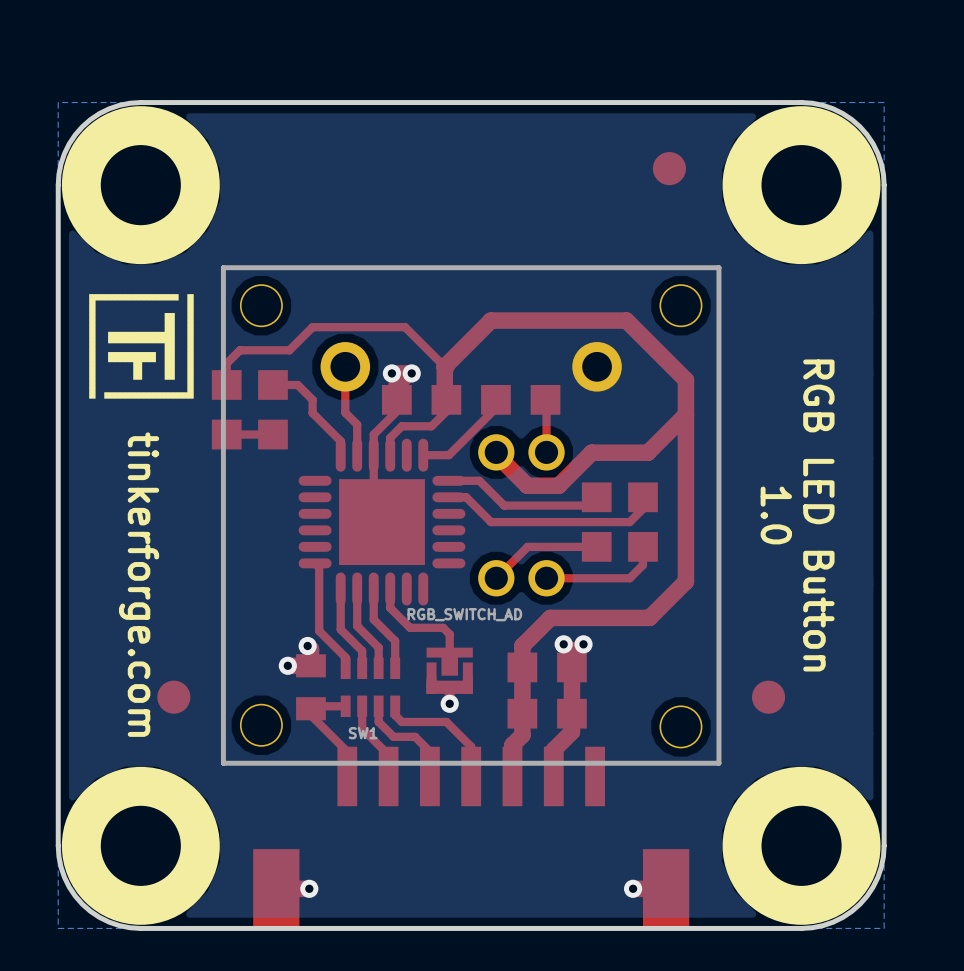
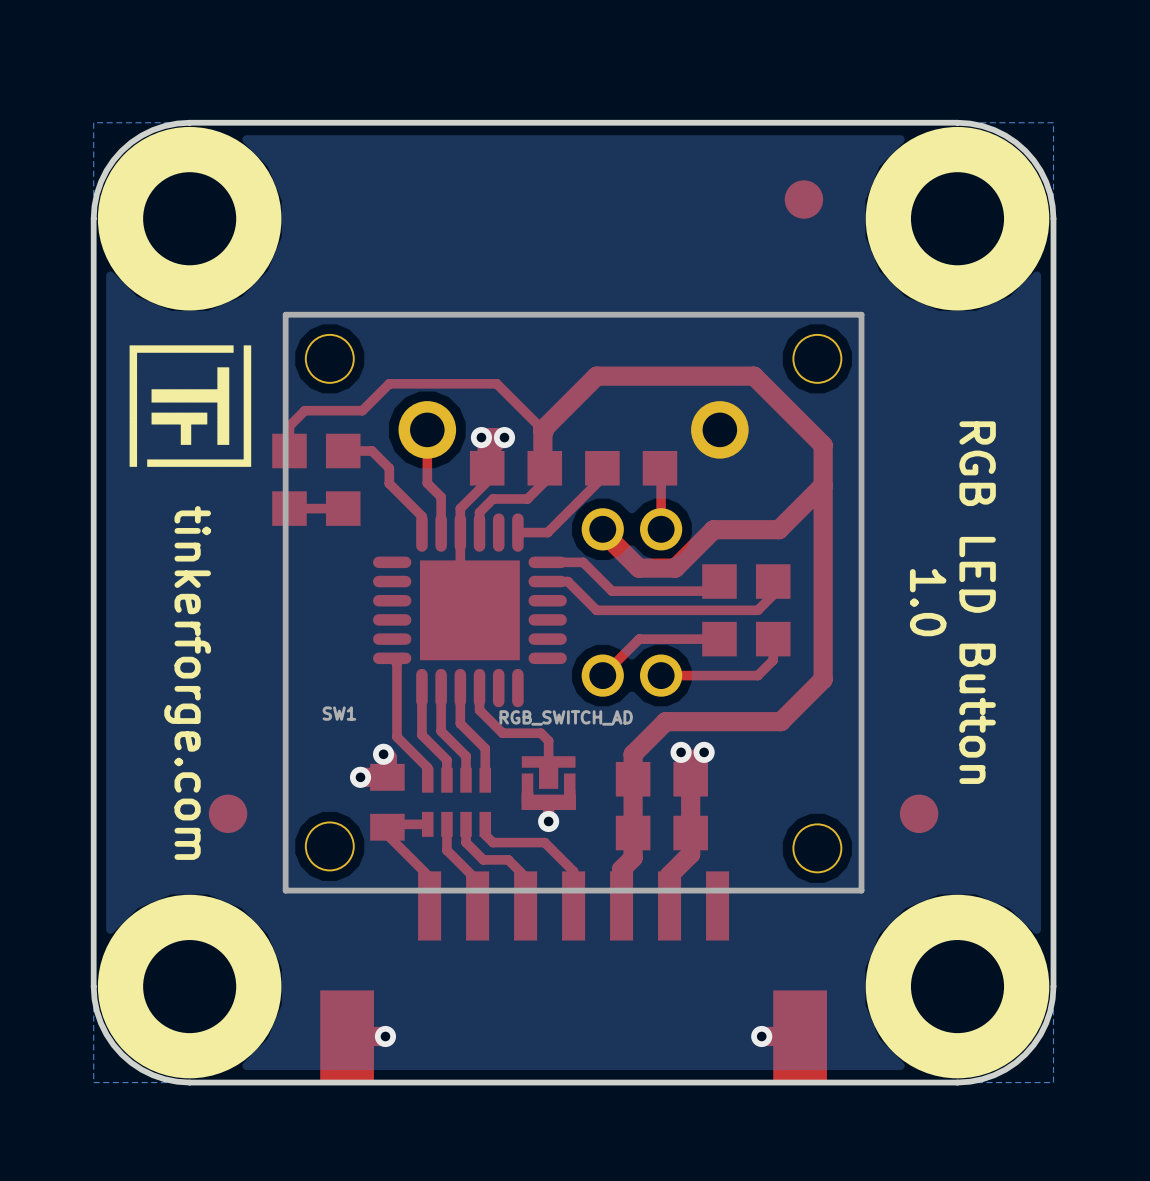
SW1 name position: SW1 (363, 733) -> SW1 (339, 713)

